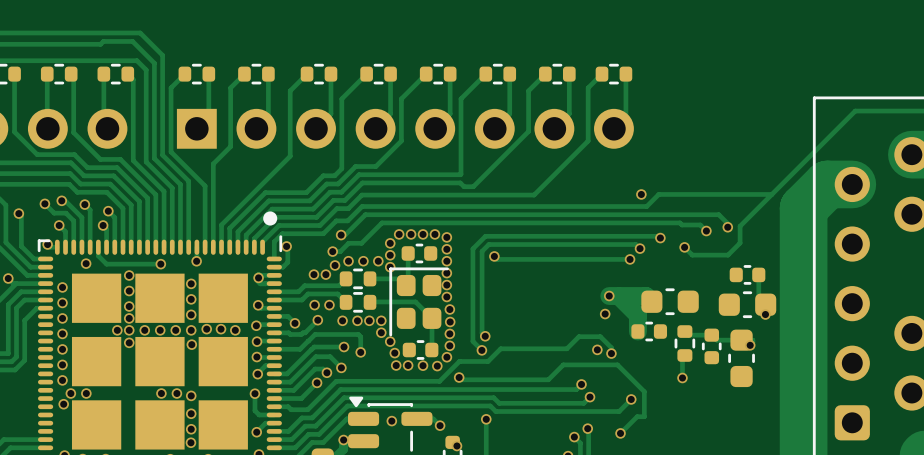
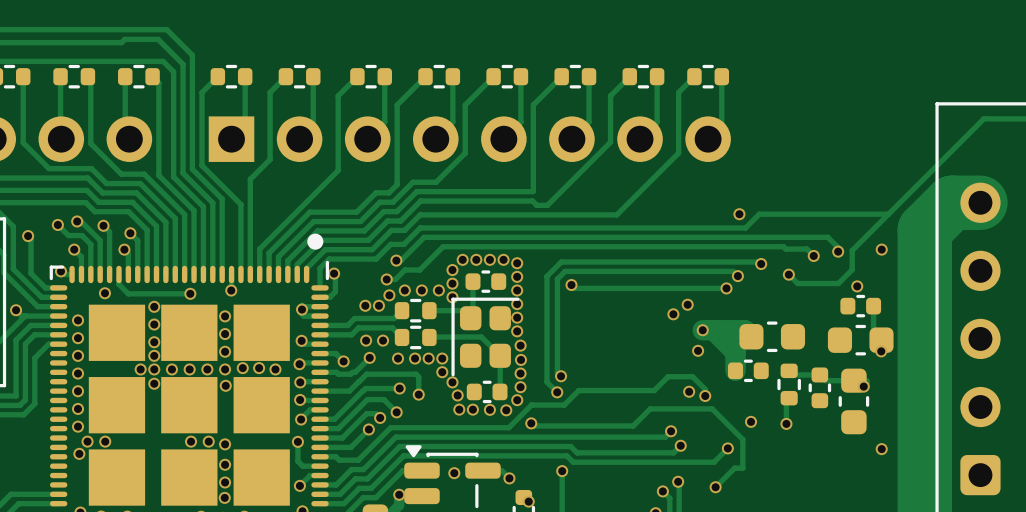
via: none -> (881, 249)
via: none -> (857, 286)
via: none -> (687, 304)
via: none -> (673, 314)
via: none -> (751, 421)
via: none -> (881, 449)

